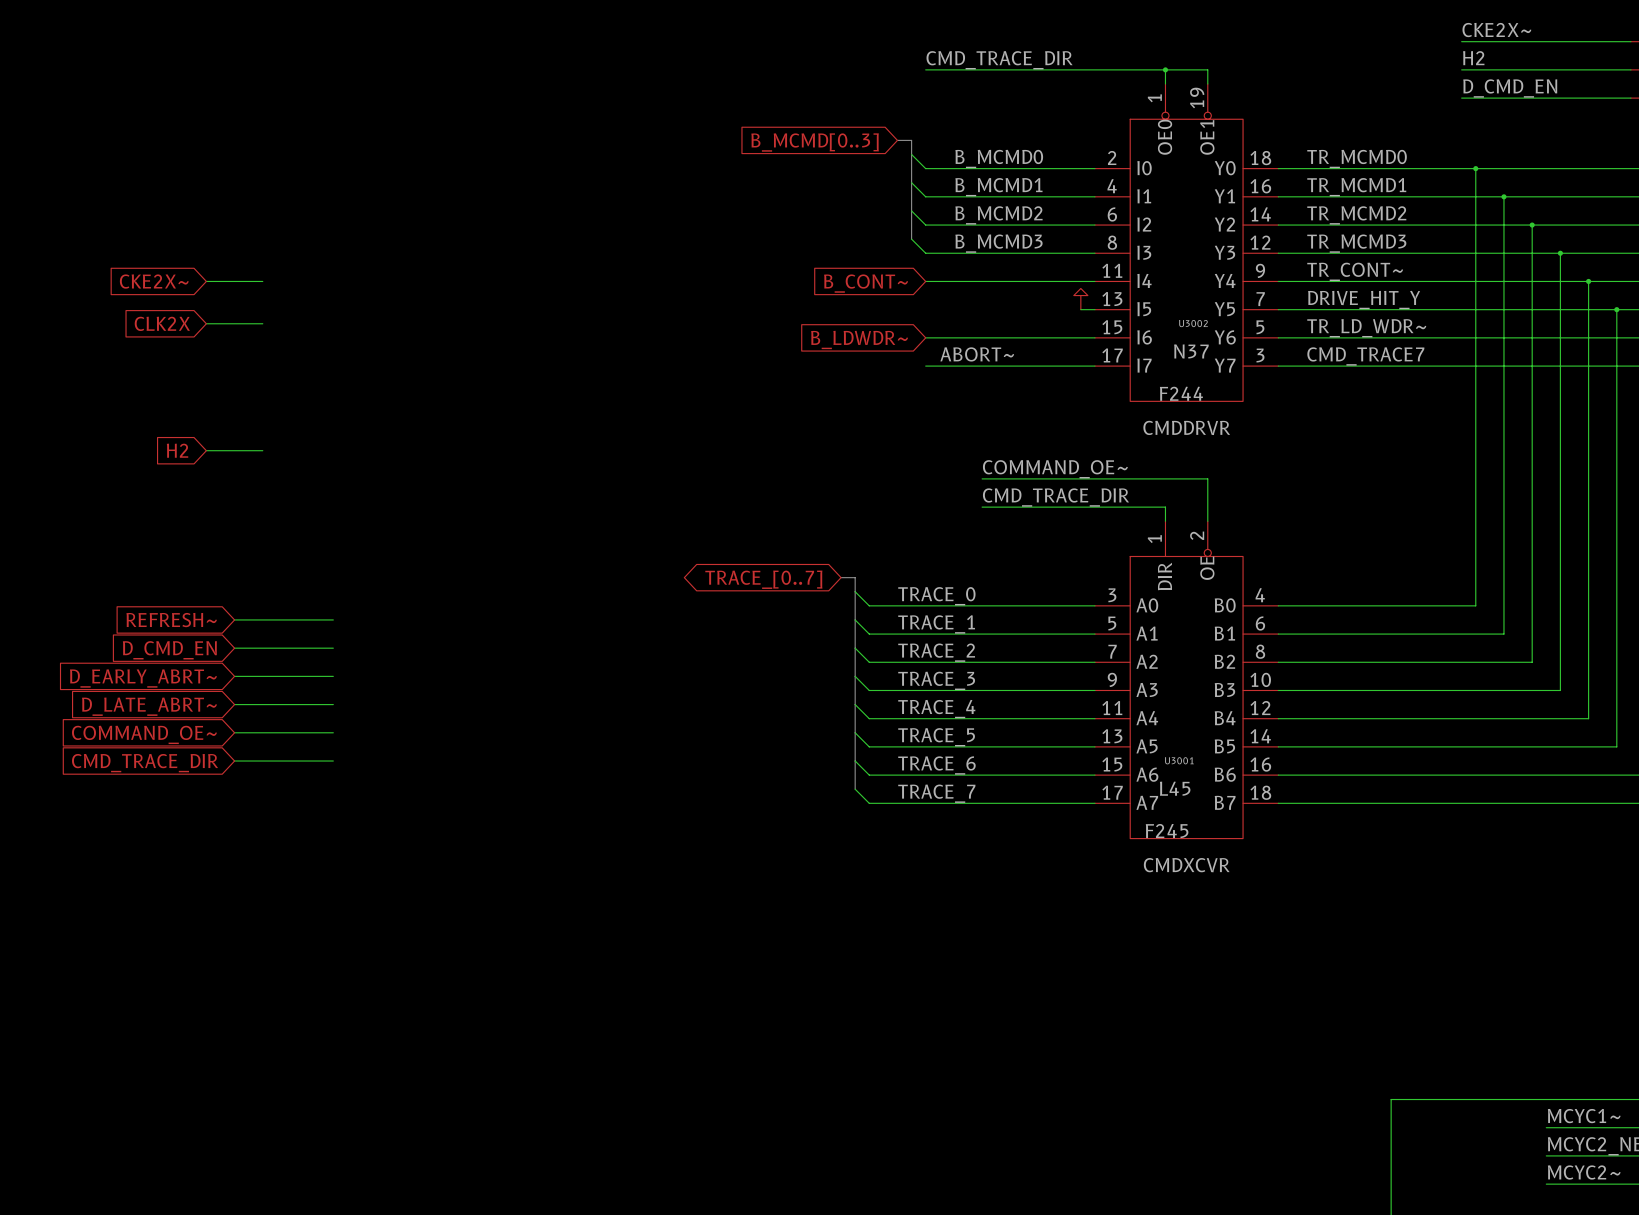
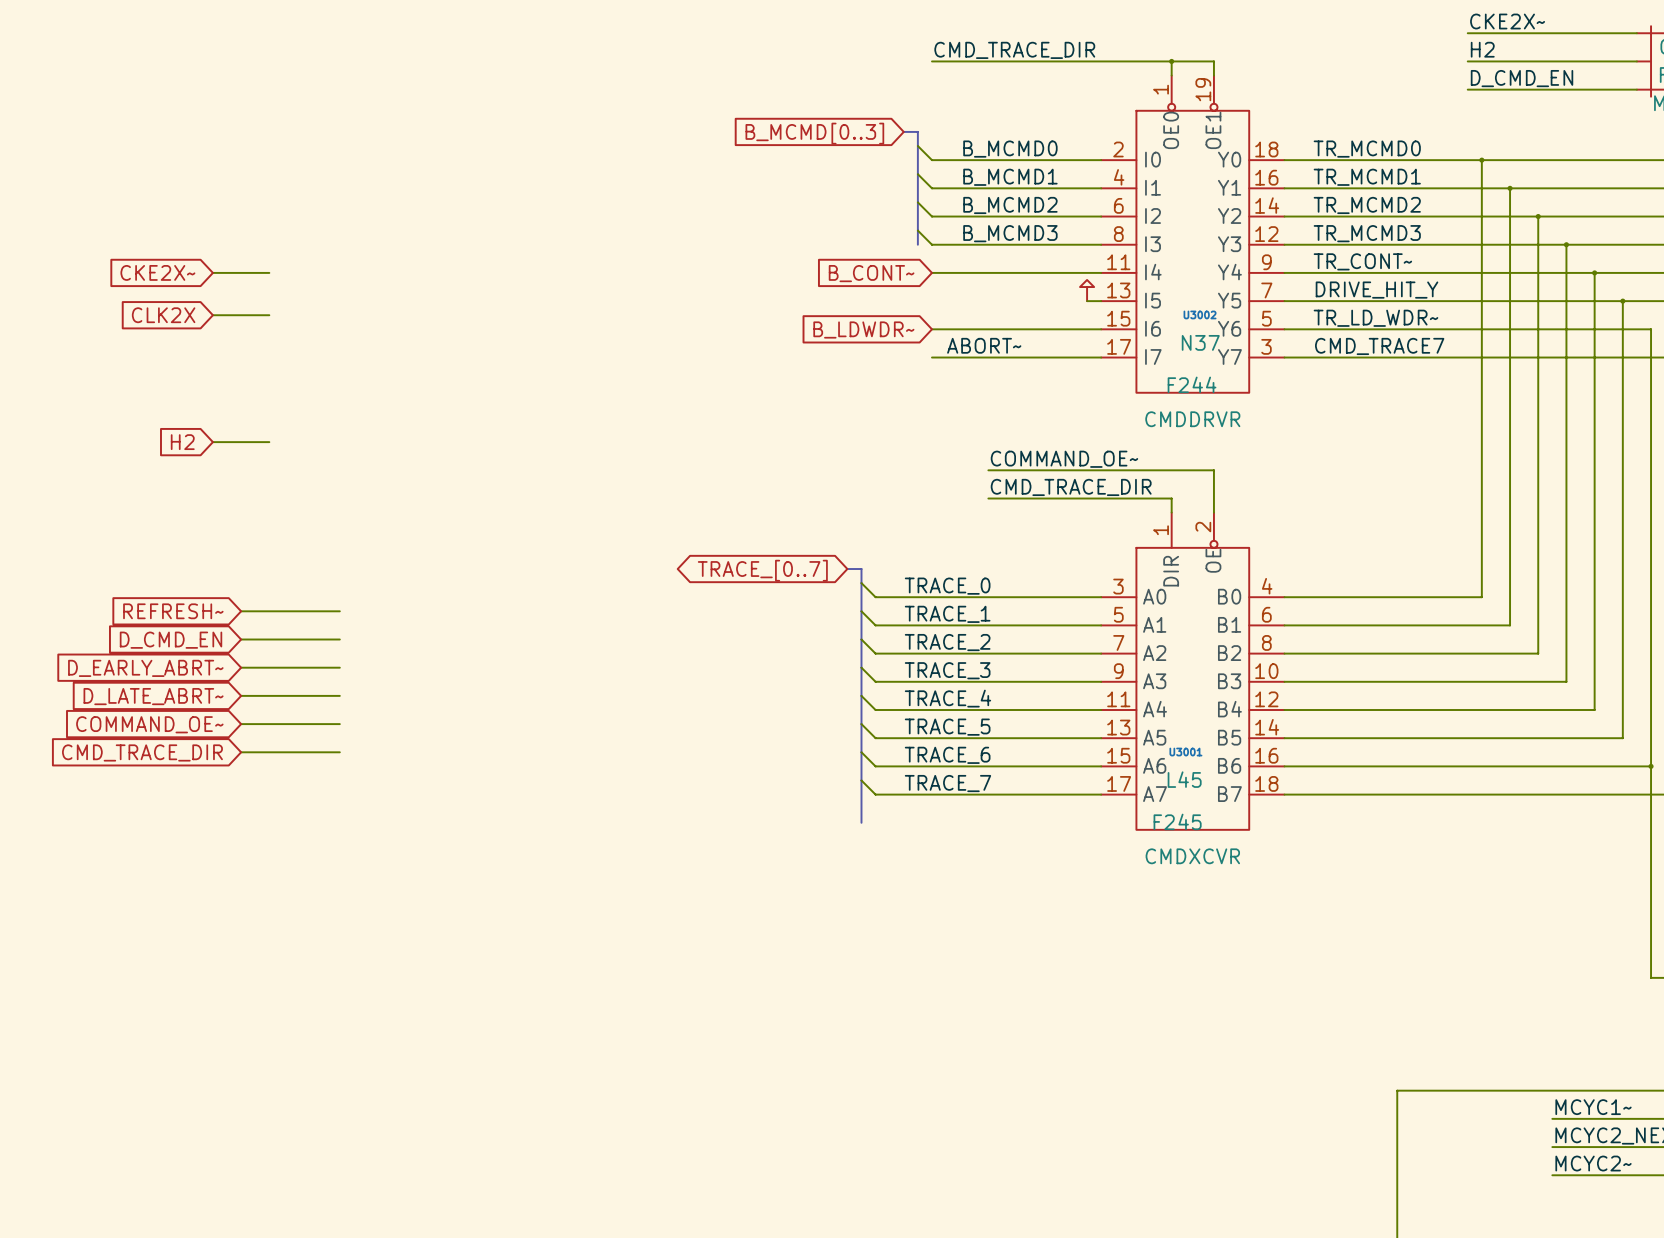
bus: none -> (917, 230) (917, 244)
bus: none -> (861, 780) (861, 822)

